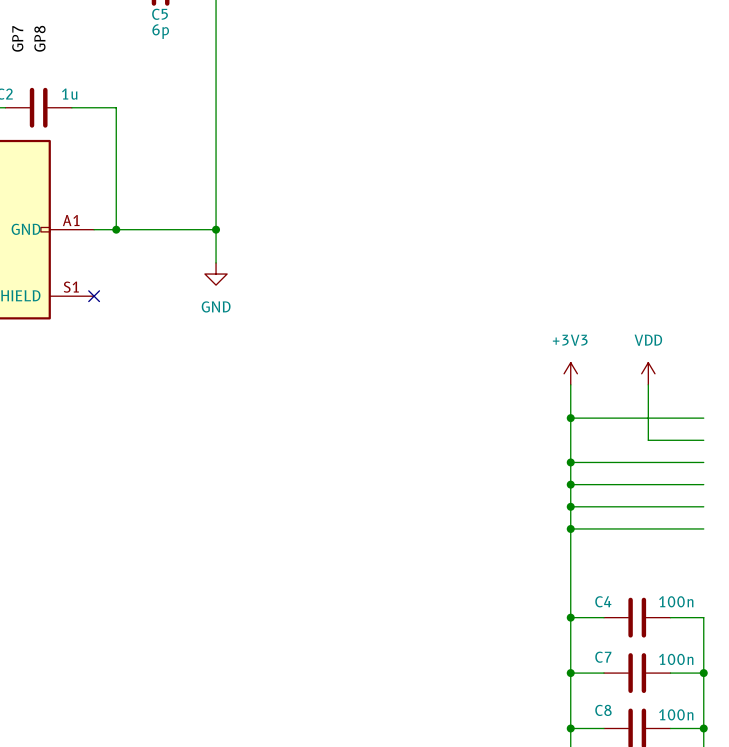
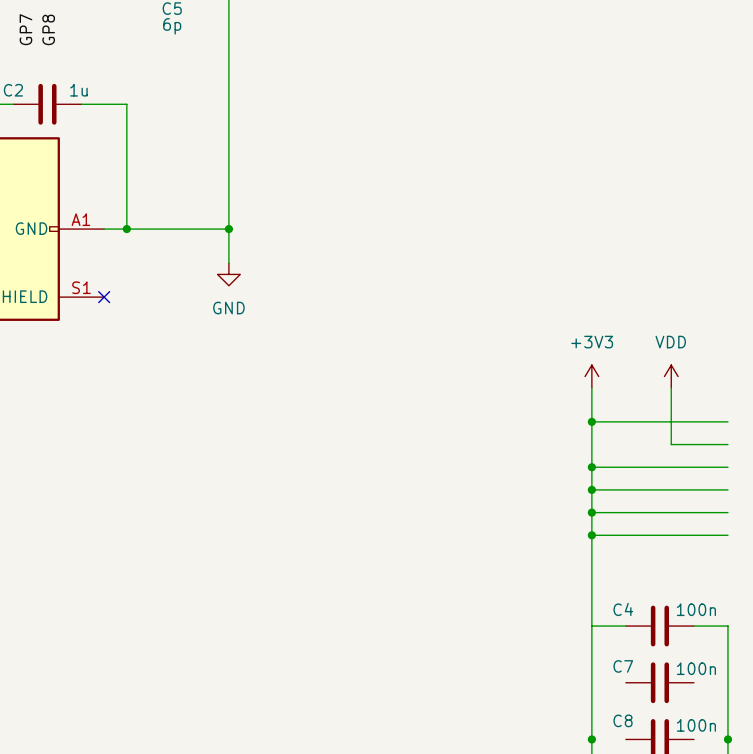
junction: (570, 617) -> none
wire: (570, 673) (603, 673) -> none
junction: (570, 673) -> none
wire: (670, 673) (703, 673) -> none
junction: (703, 673) -> none
wire: (570, 728) (603, 728) -> none
wire: (670, 728) (703, 728) -> none

